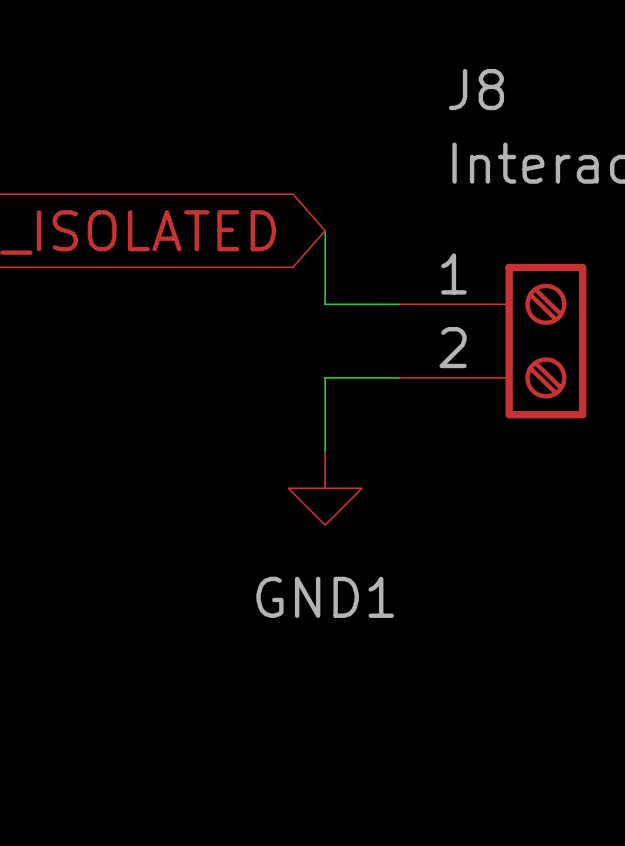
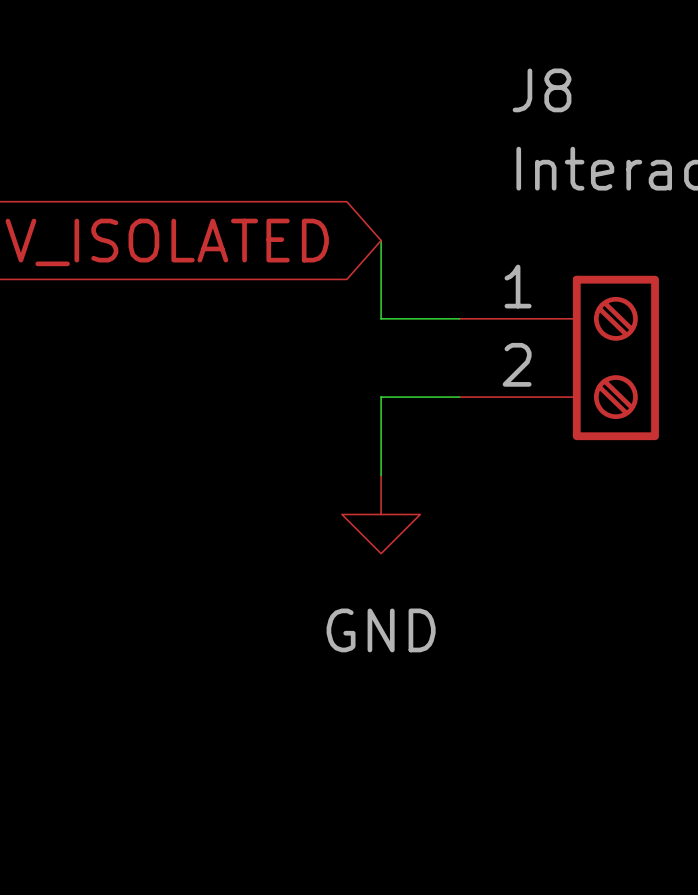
power symbol: GND1 (325, 488) -> GND (381, 514)

